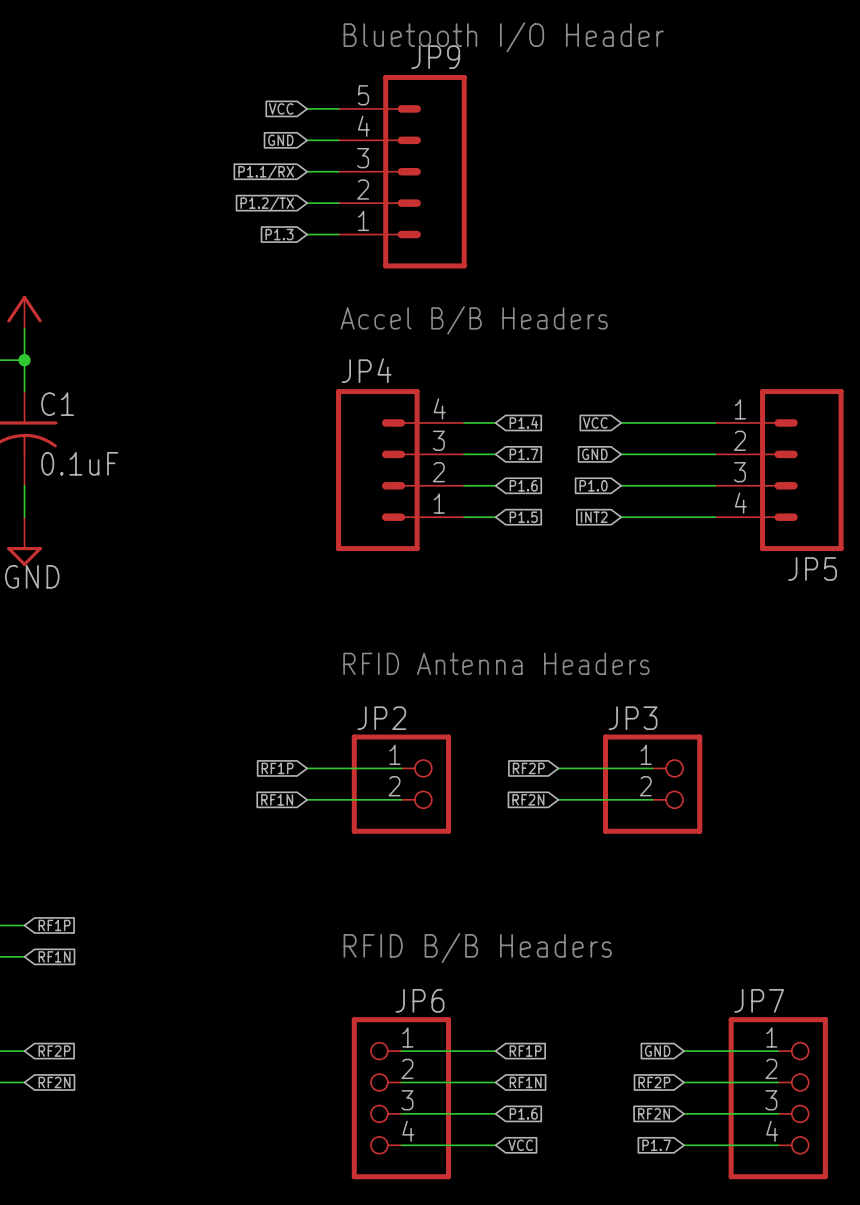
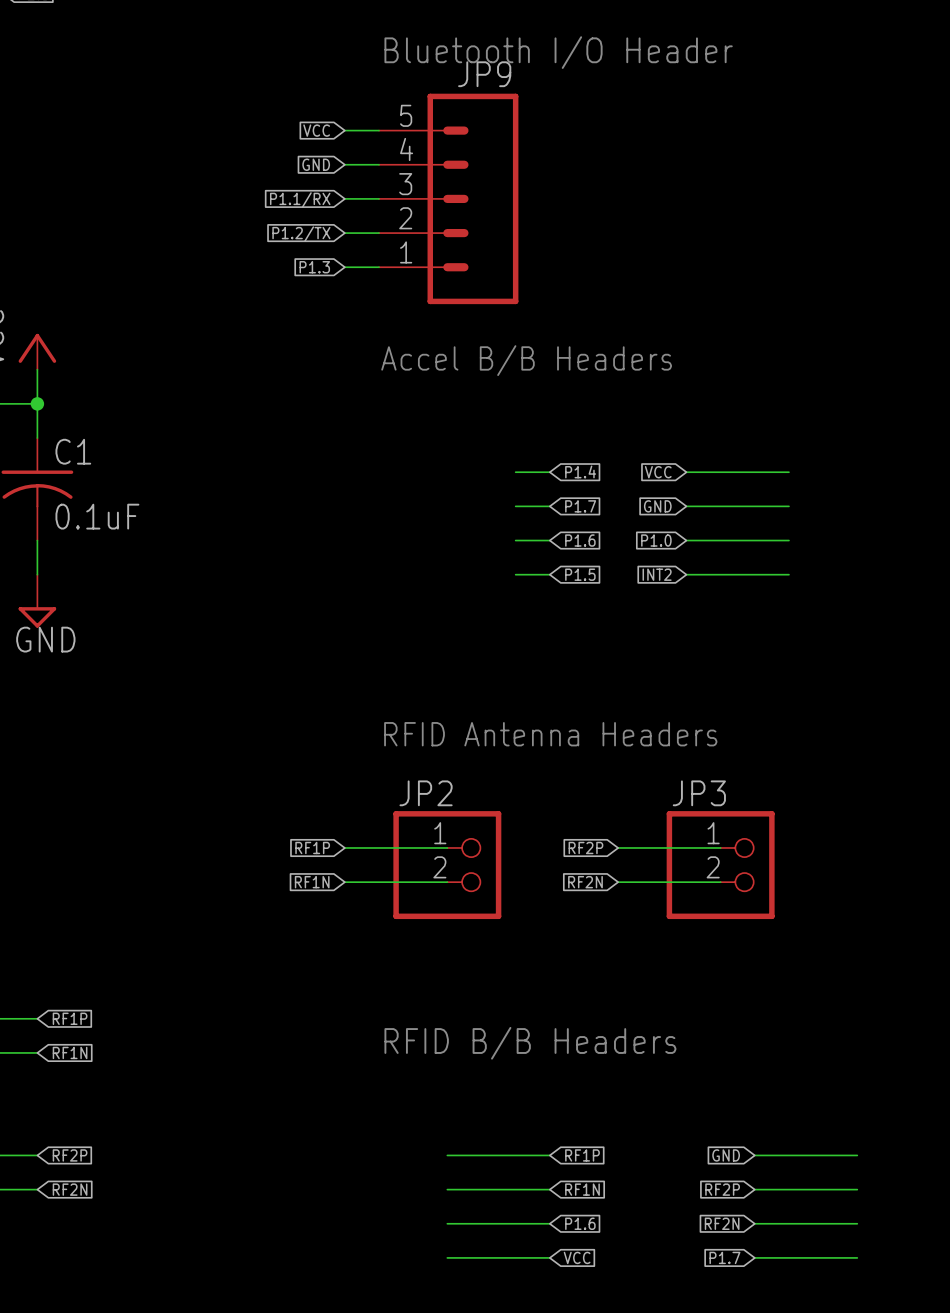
JP4: (400, 470) -> none
JP5: (779, 470) -> none
JP6: (401, 1098) -> none
JP7: (778, 1098) -> none

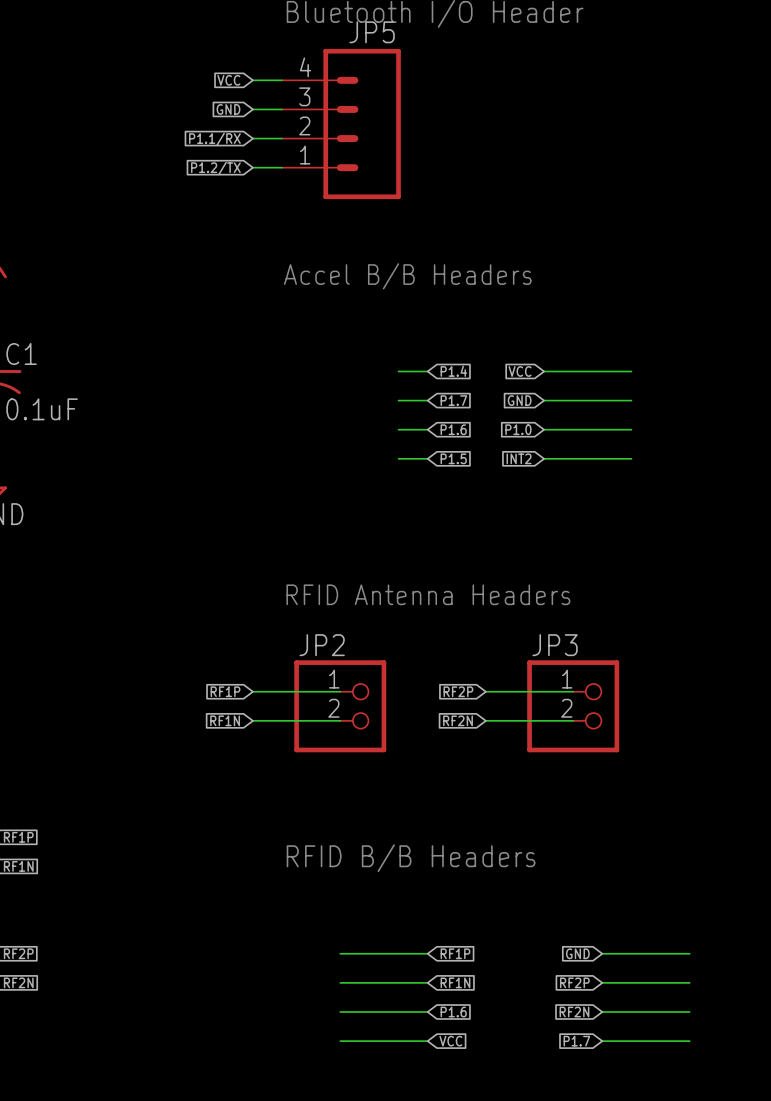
JP5: none -> (341, 124)
JP9: (448, 198) -> none
global label: P1.3 (314, 267) -> none
wire: (344, 267) (379, 267) -> none

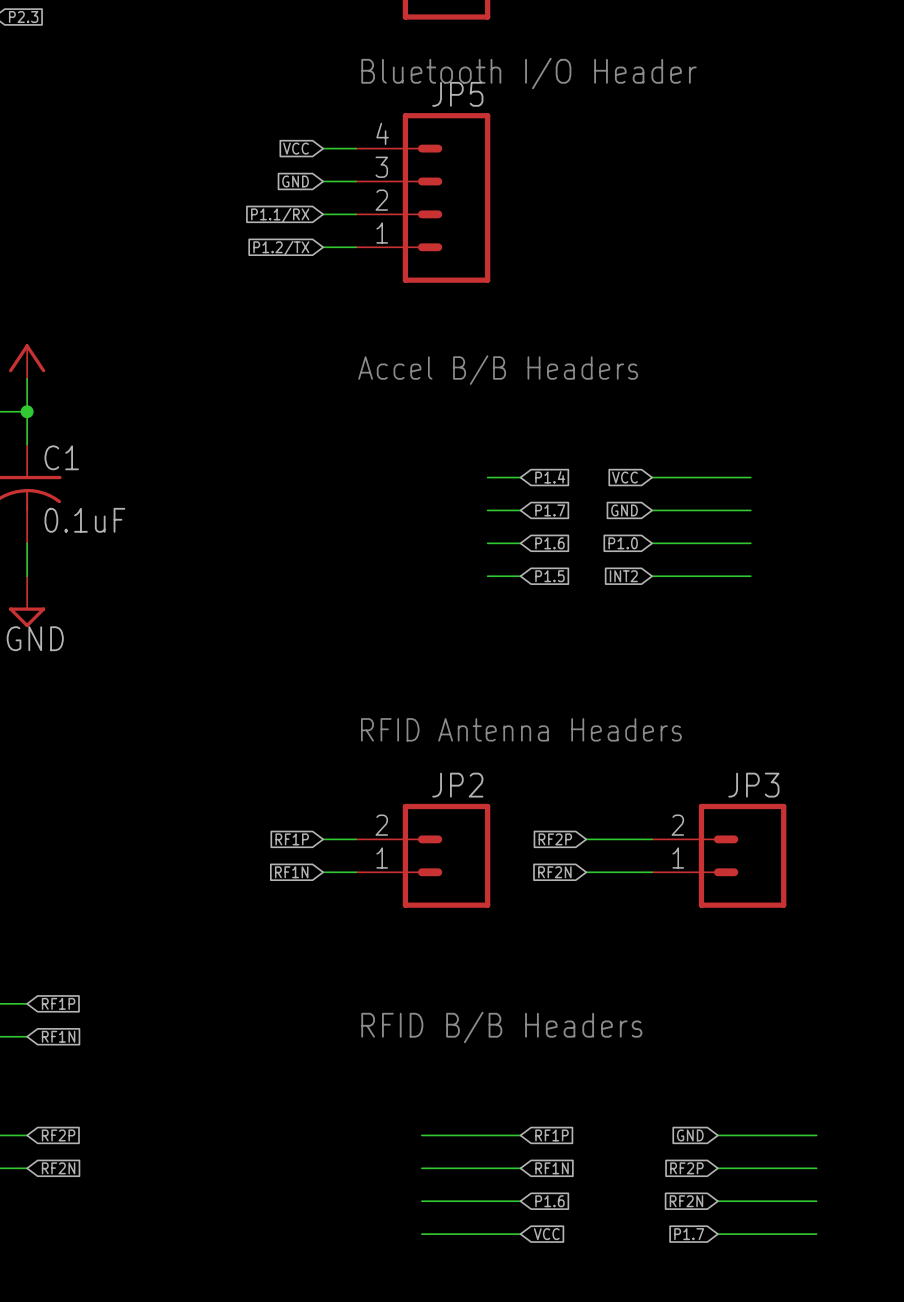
JP2 name position: JP2 (322, 645) -> JP2 (457, 785)
JP3 name position: JP3 (555, 645) -> JP3 (753, 785)
JP2 symbol: [294, 660, 387, 753] -> [356, 803, 491, 908]
JP3 symbol: [527, 660, 620, 753] -> [652, 803, 787, 908]

